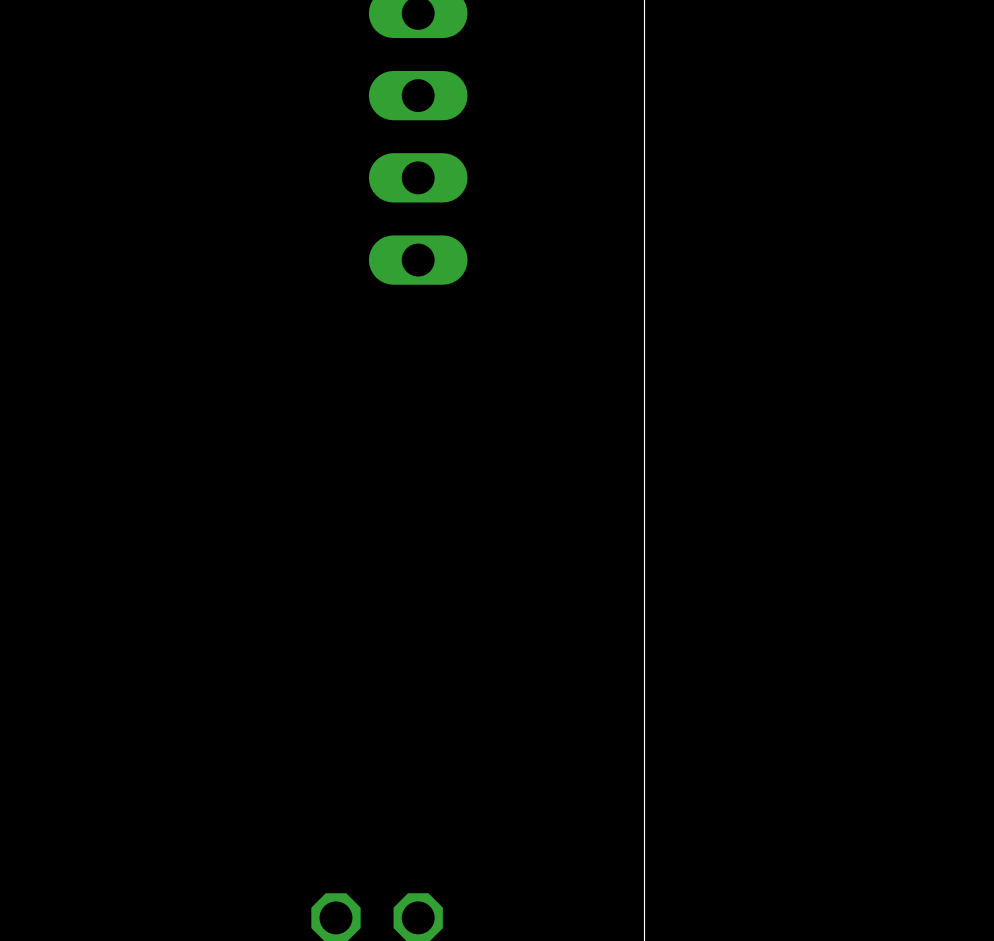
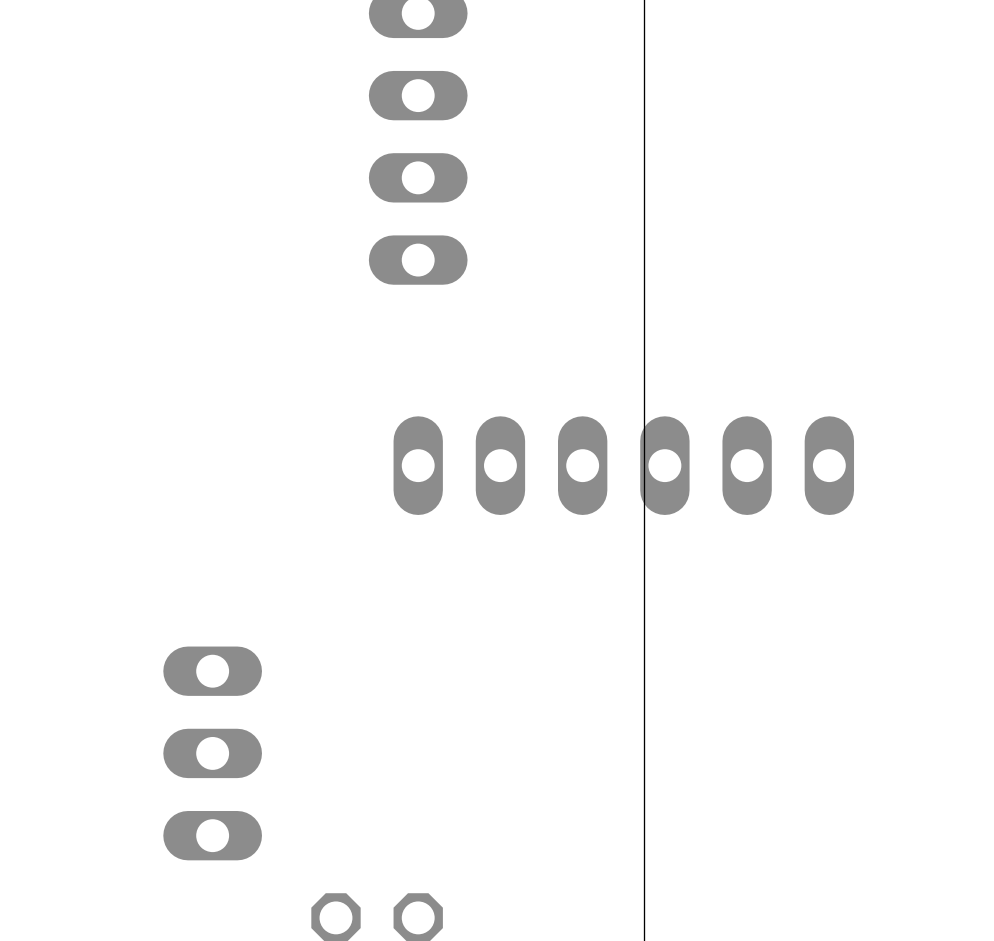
part: none -> (623, 465)
part: none -> (212, 753)

